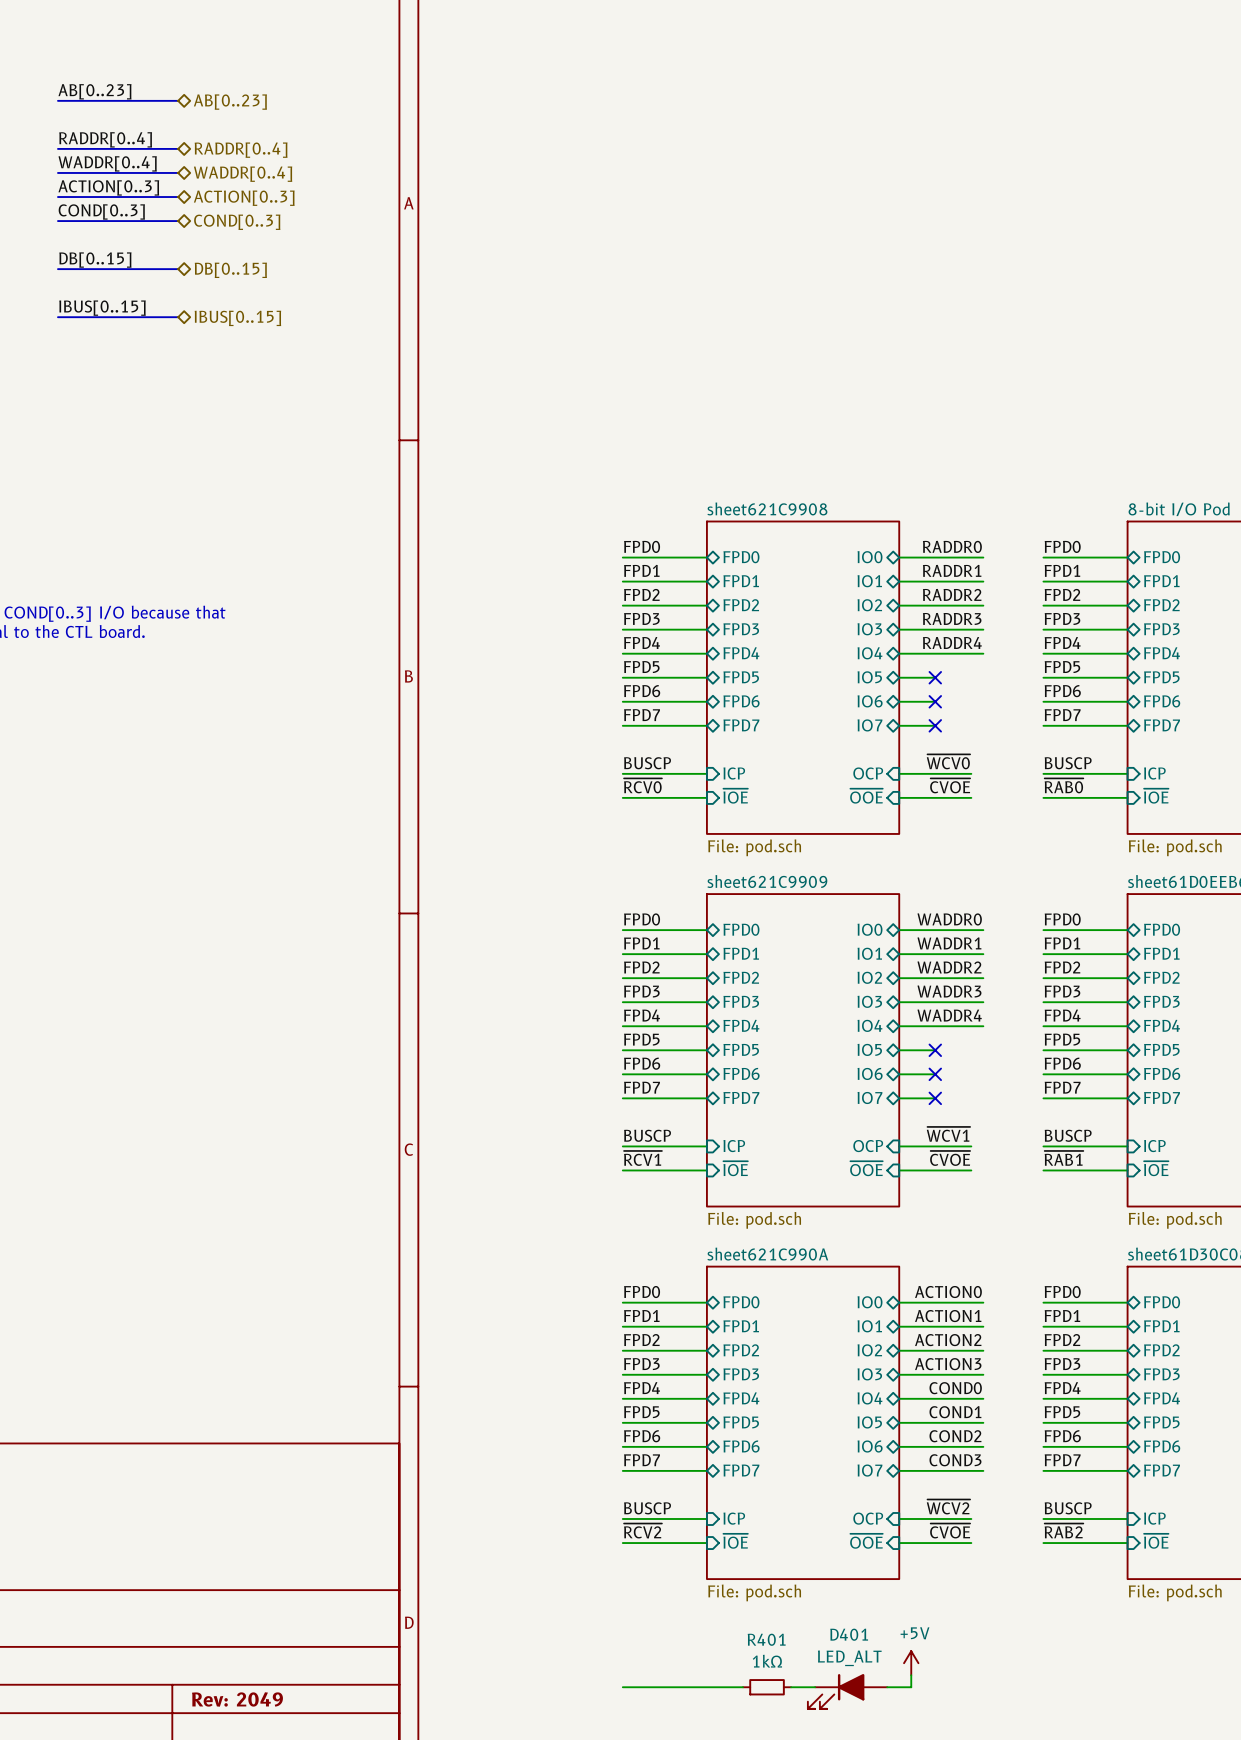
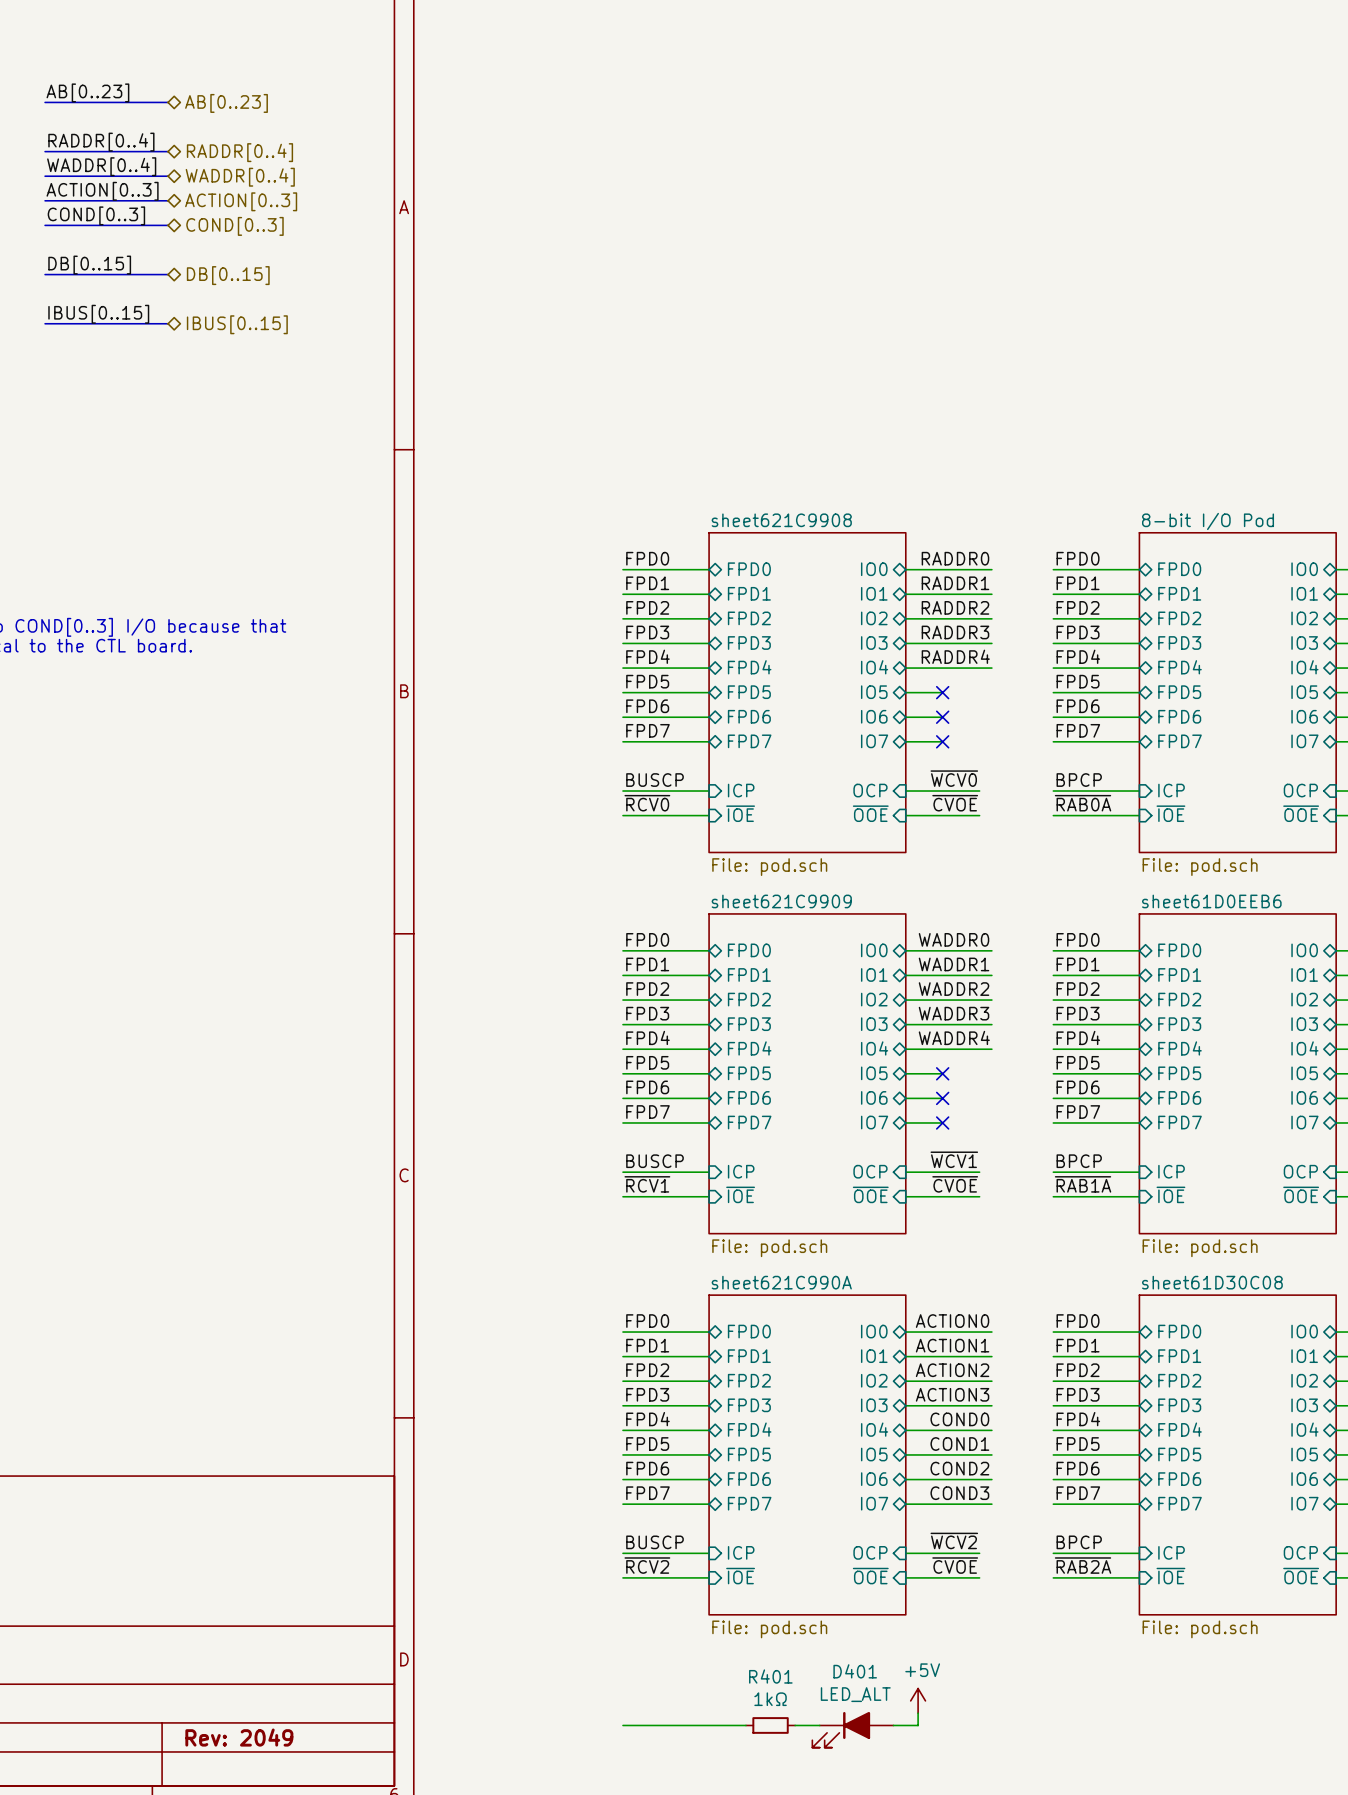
label: BUSCP (1068, 763) -> BPCP (1079, 780)
label: ~{RAB0} (1064, 785) -> ~{RAB0A} (1083, 803)
label: BUSCP (1068, 1135) -> BPCP (1079, 1161)
label: ~{RAB1} (1064, 1158) -> ~{RAB1A} (1083, 1184)
label: BUSCP (1068, 1508) -> BPCP (1079, 1542)
label: ~{RAB2} (1064, 1530) -> ~{RAB2A} (1083, 1565)

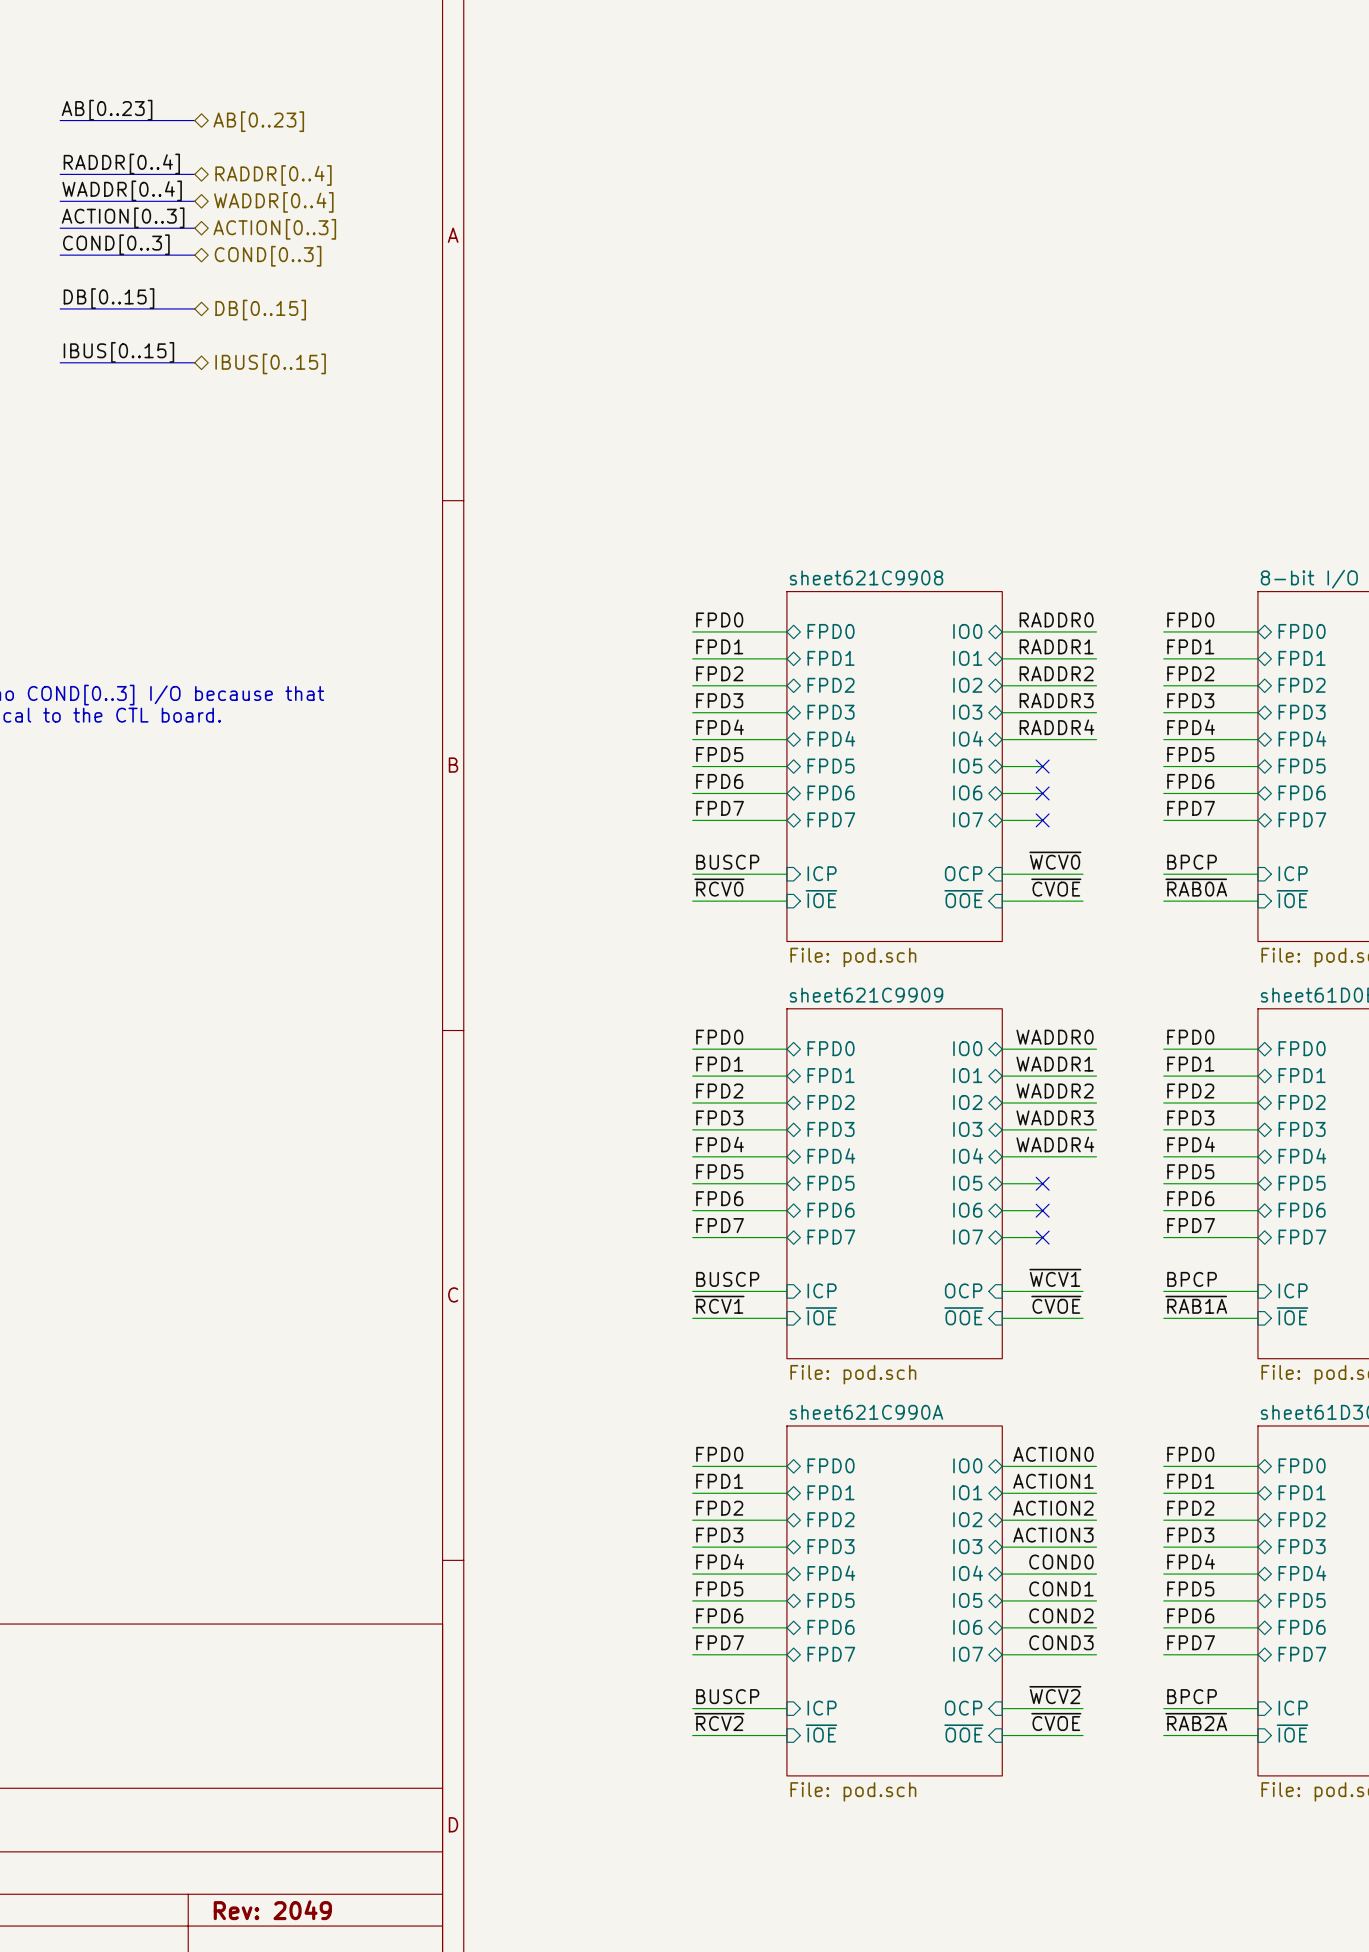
power symbol: +5V (918, 1700) -> none
wire: (918, 1713) (918, 1725) (893, 1725) -> none
wire: (622, 1725) (745, 1725) -> none
R401: 1kΩ (770, 1725) -> none
wire: (795, 1725) (819, 1725) -> none
D401: LED_ALT (852, 1729) -> none

